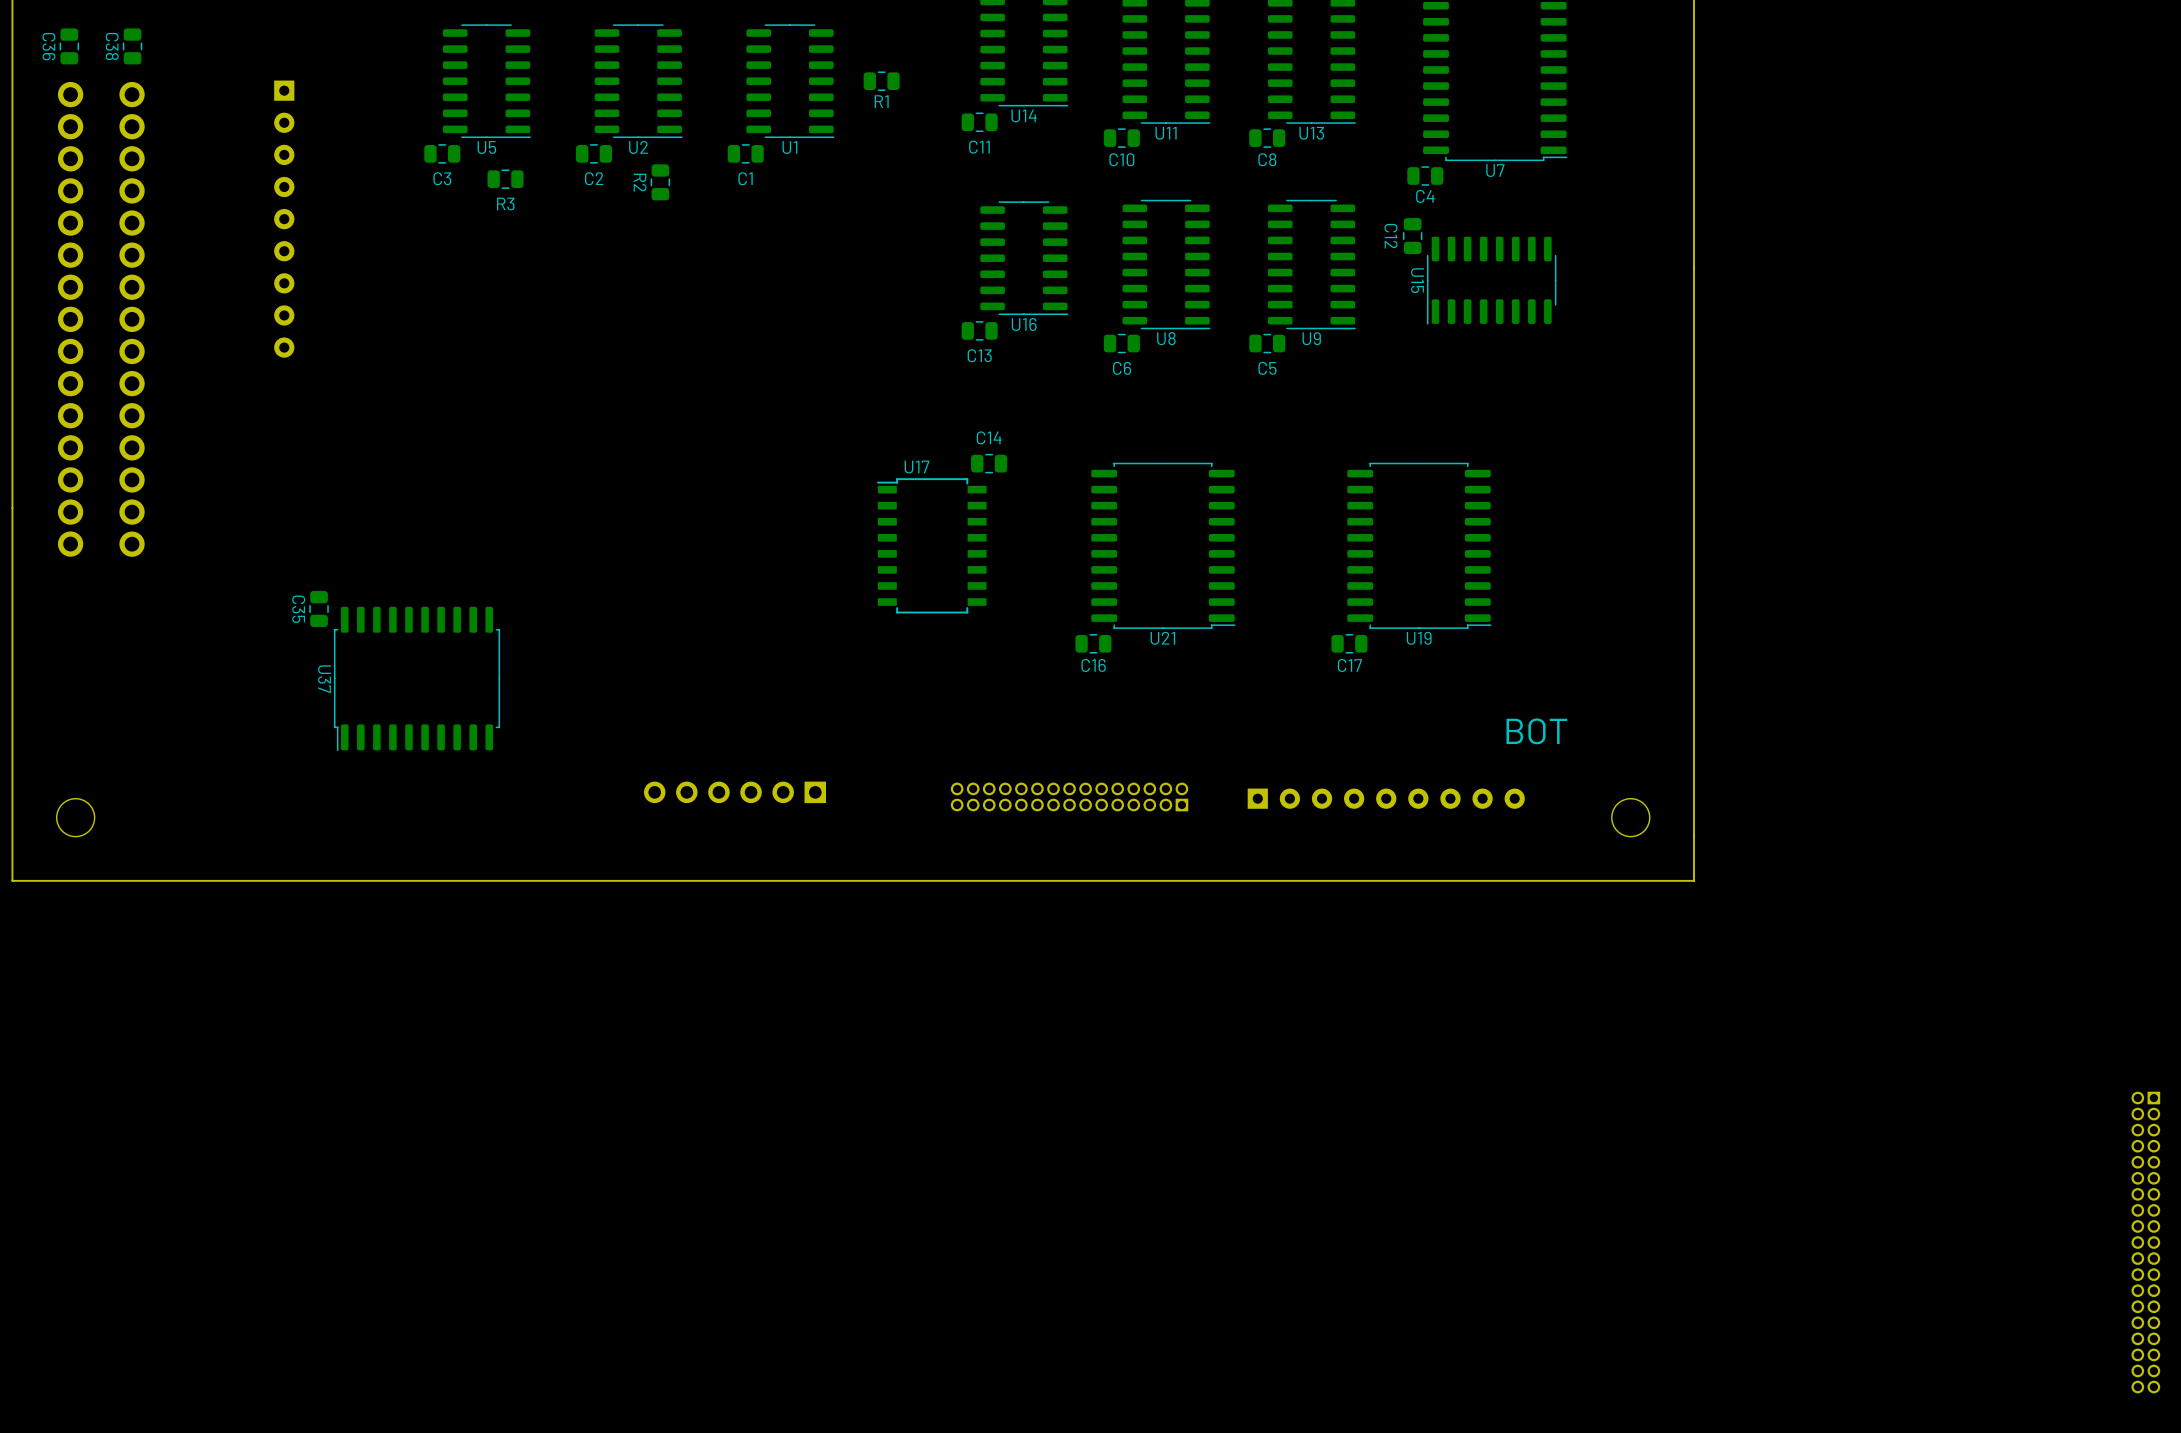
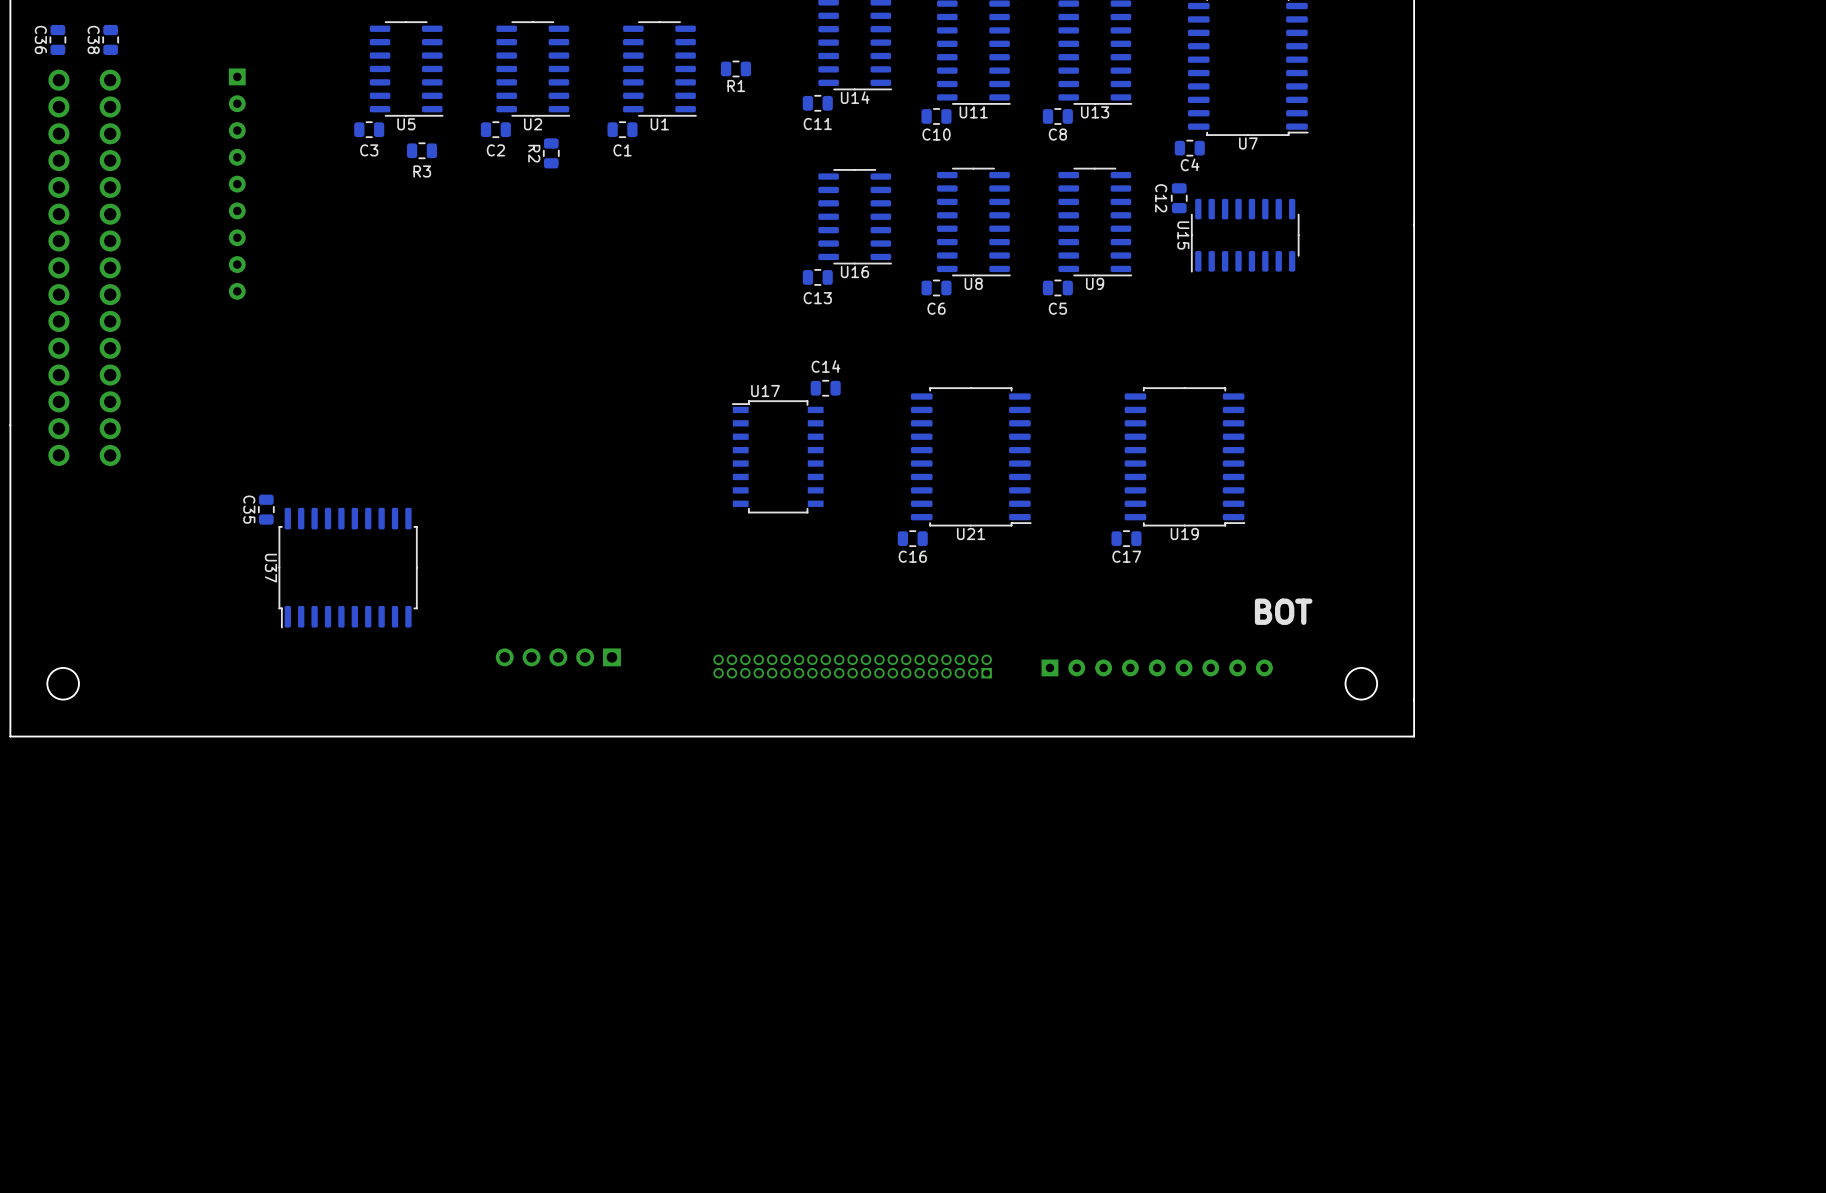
part: none -> (558, 657)
part: (734, 792) -> none
part: none -> (852, 666)
part: (2145, 1242) -> none

